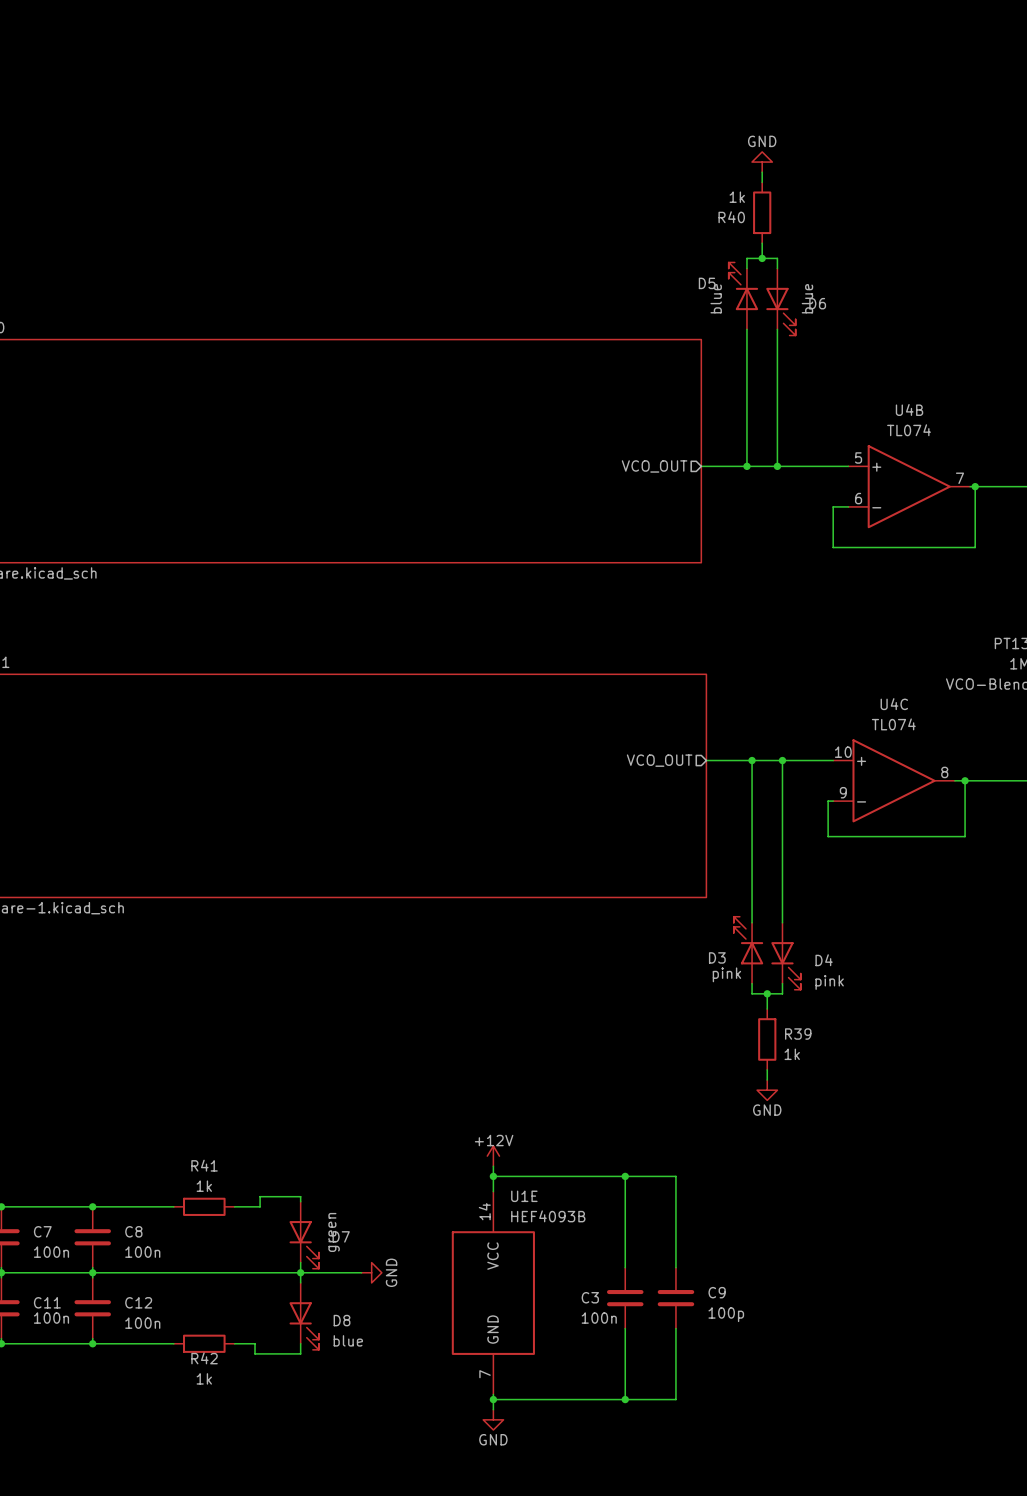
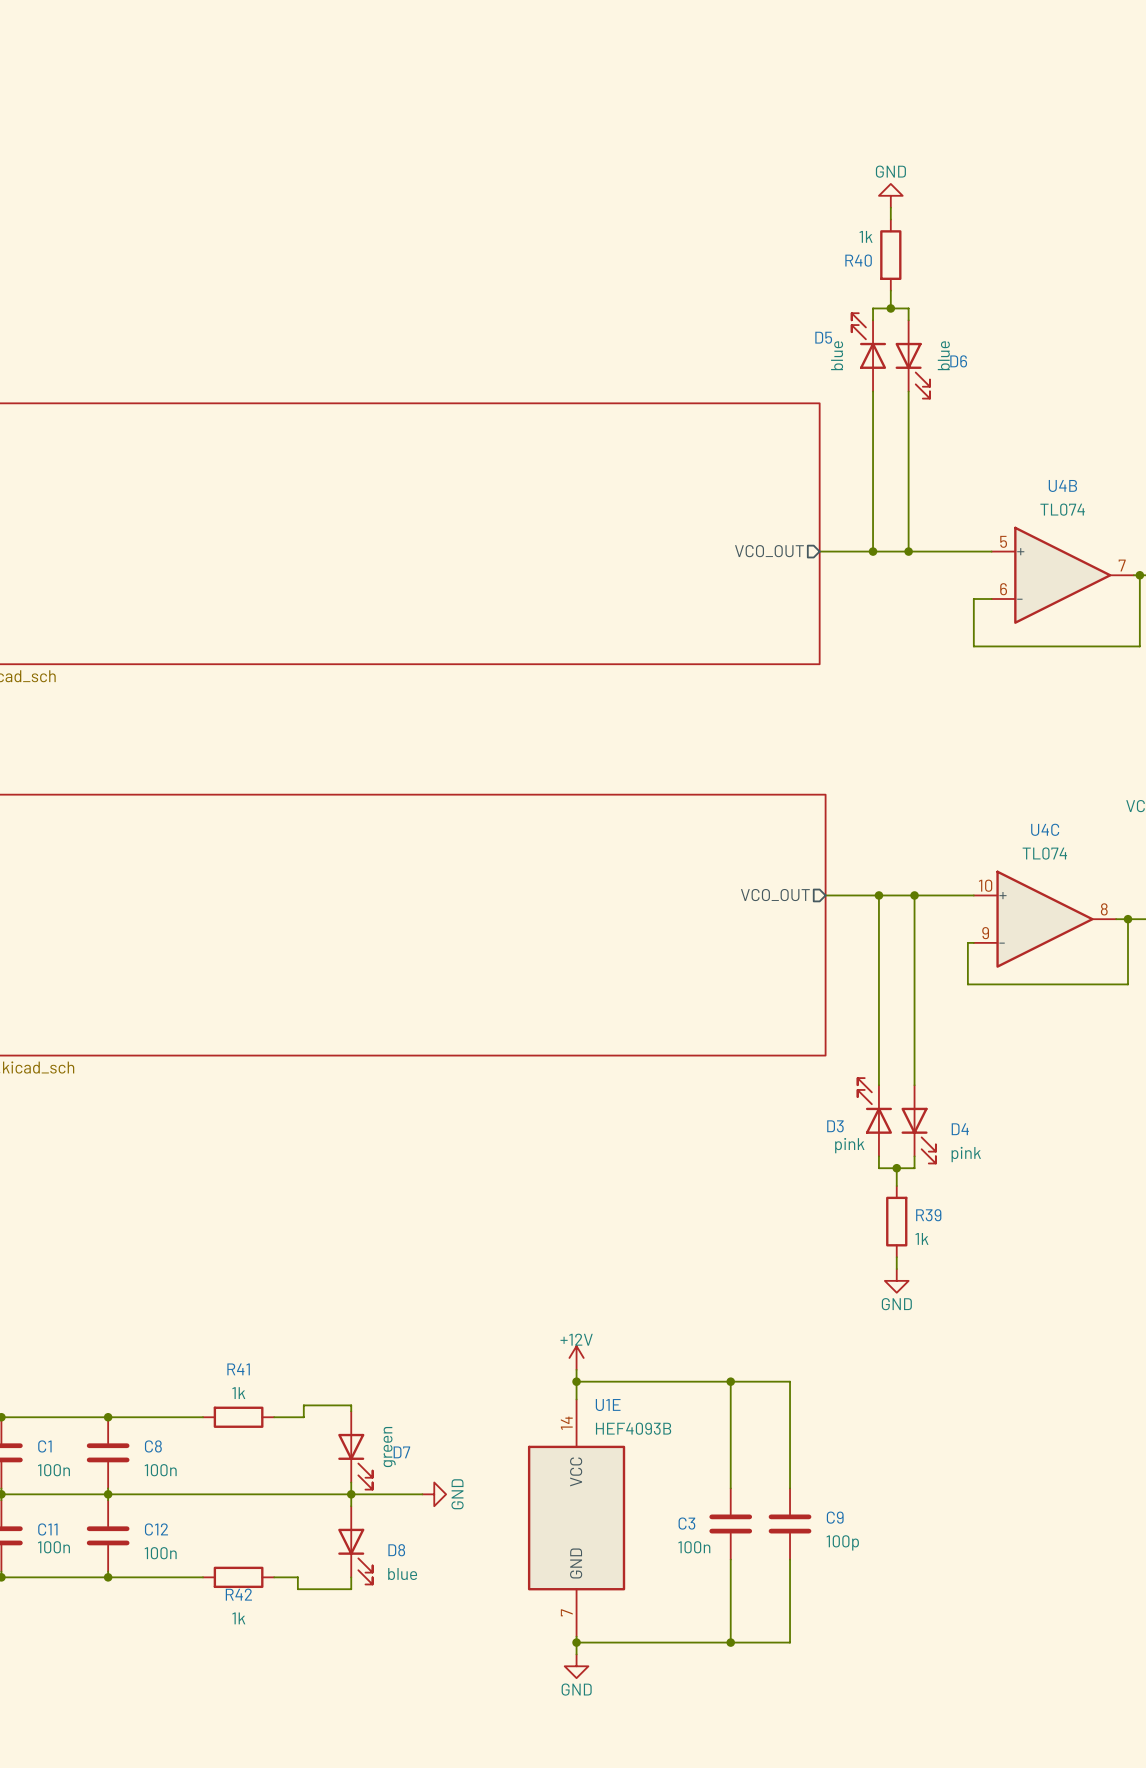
C7 name: C7 (42, 1231) -> C1 (44, 1446)

